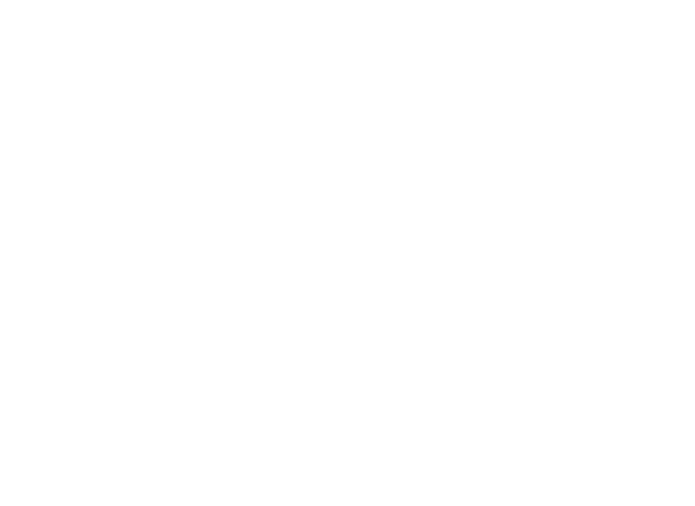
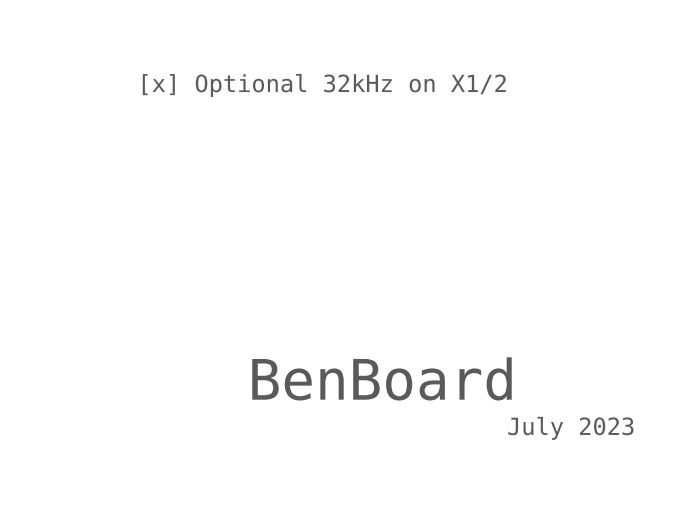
text: none -> [x] Optional 32kHz on X1/2 (324, 85)
text: none -> BenBoard (381, 378)
text: none -> July 2023 (570, 428)

